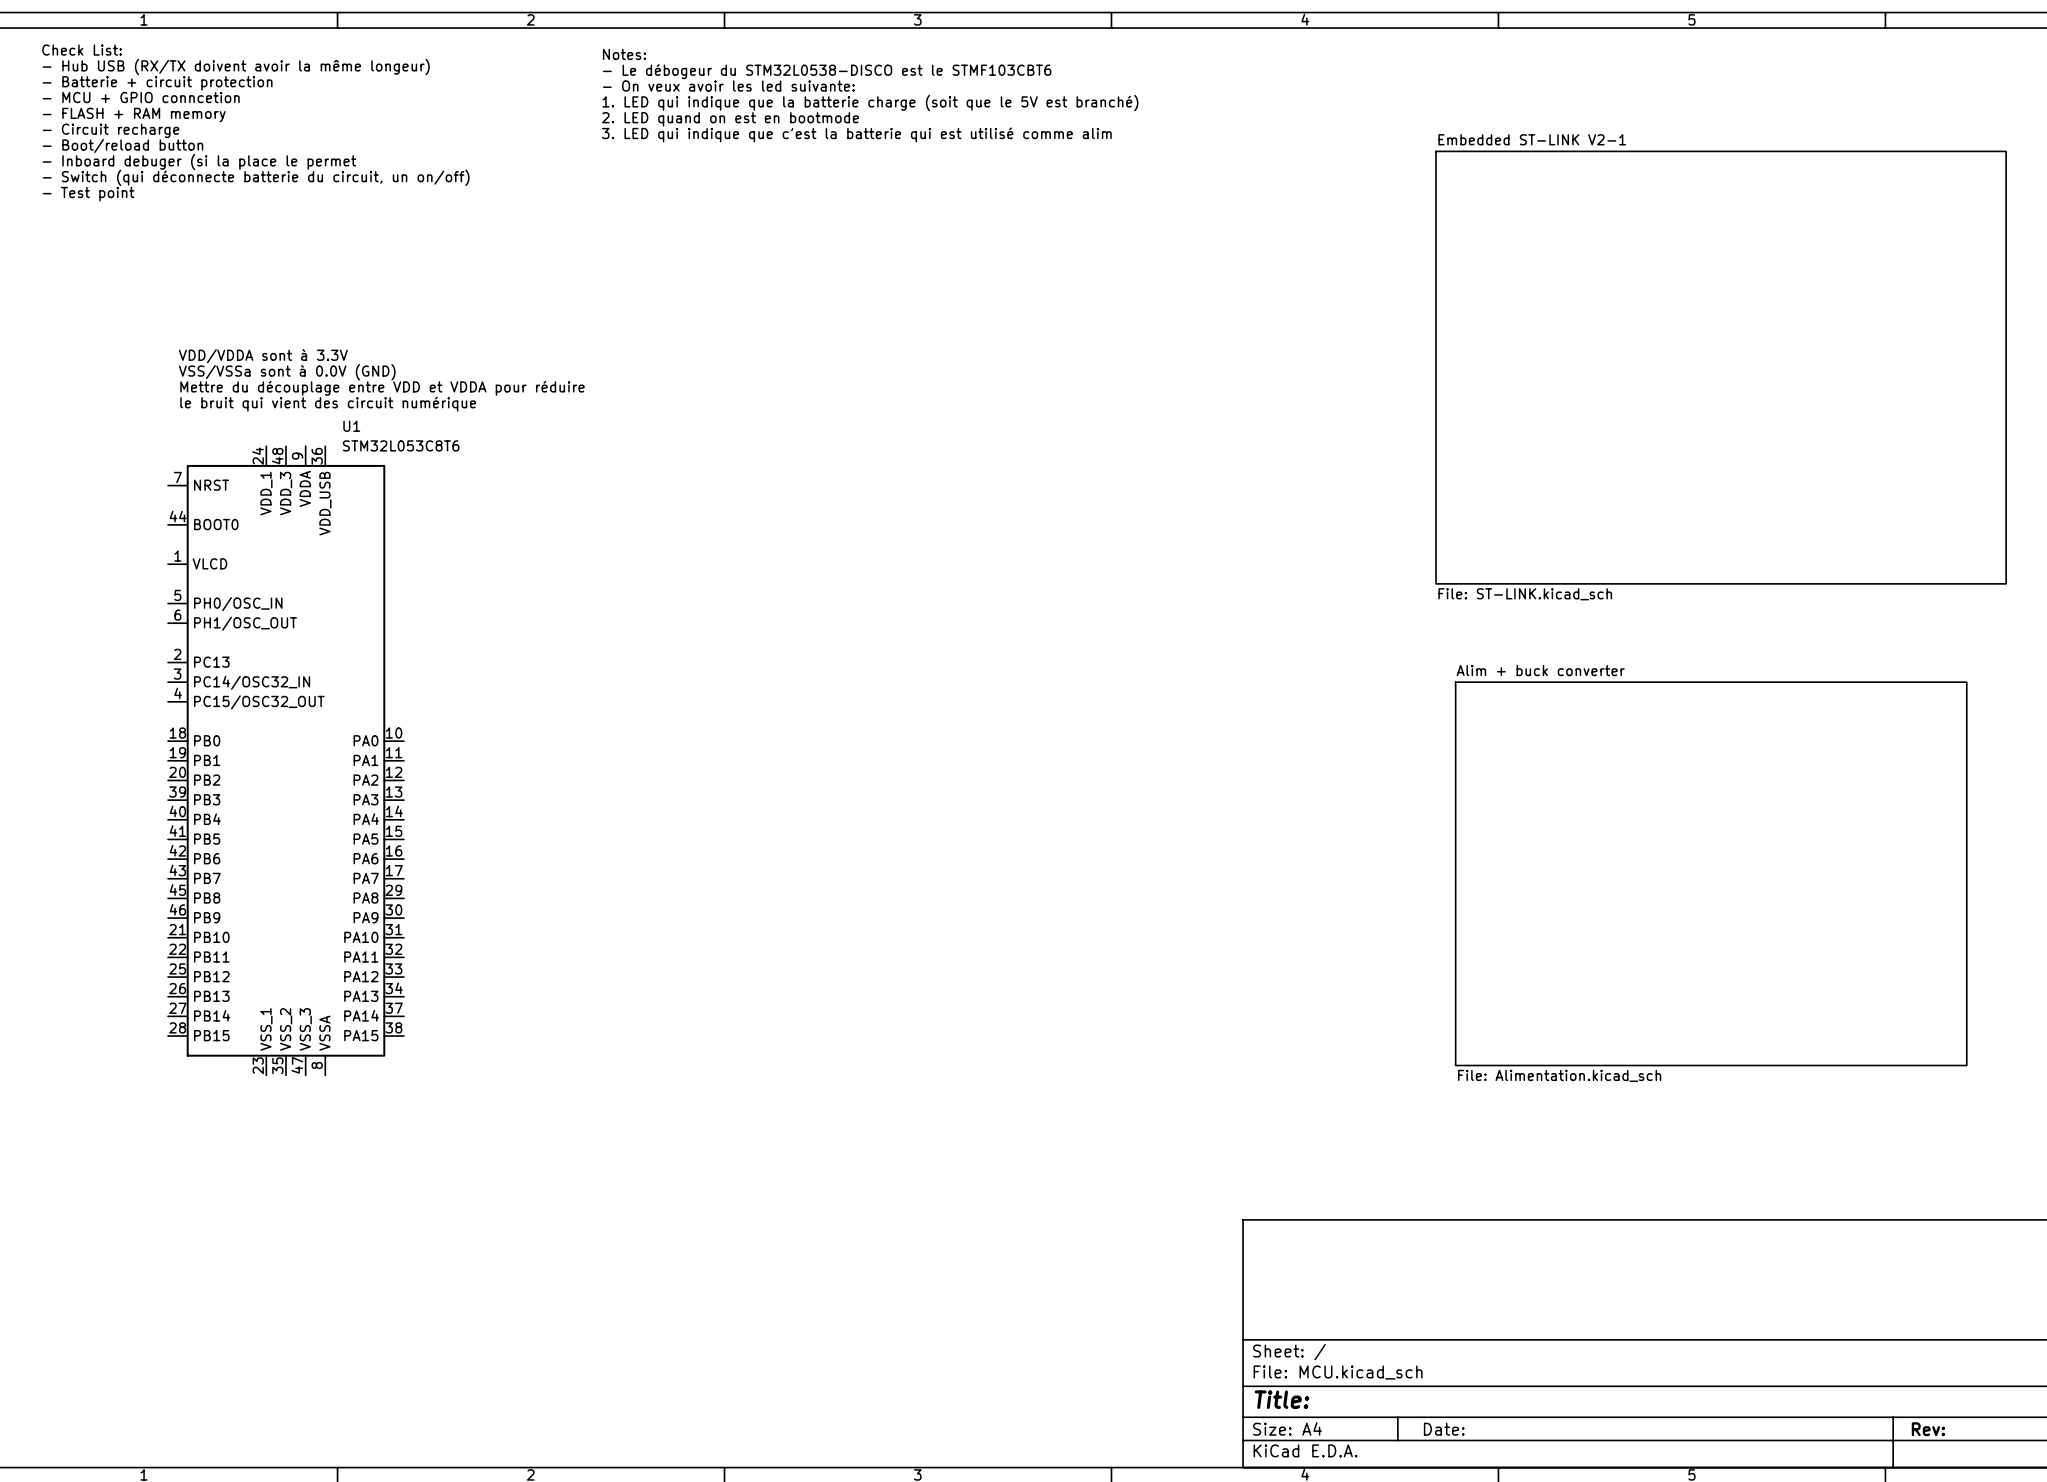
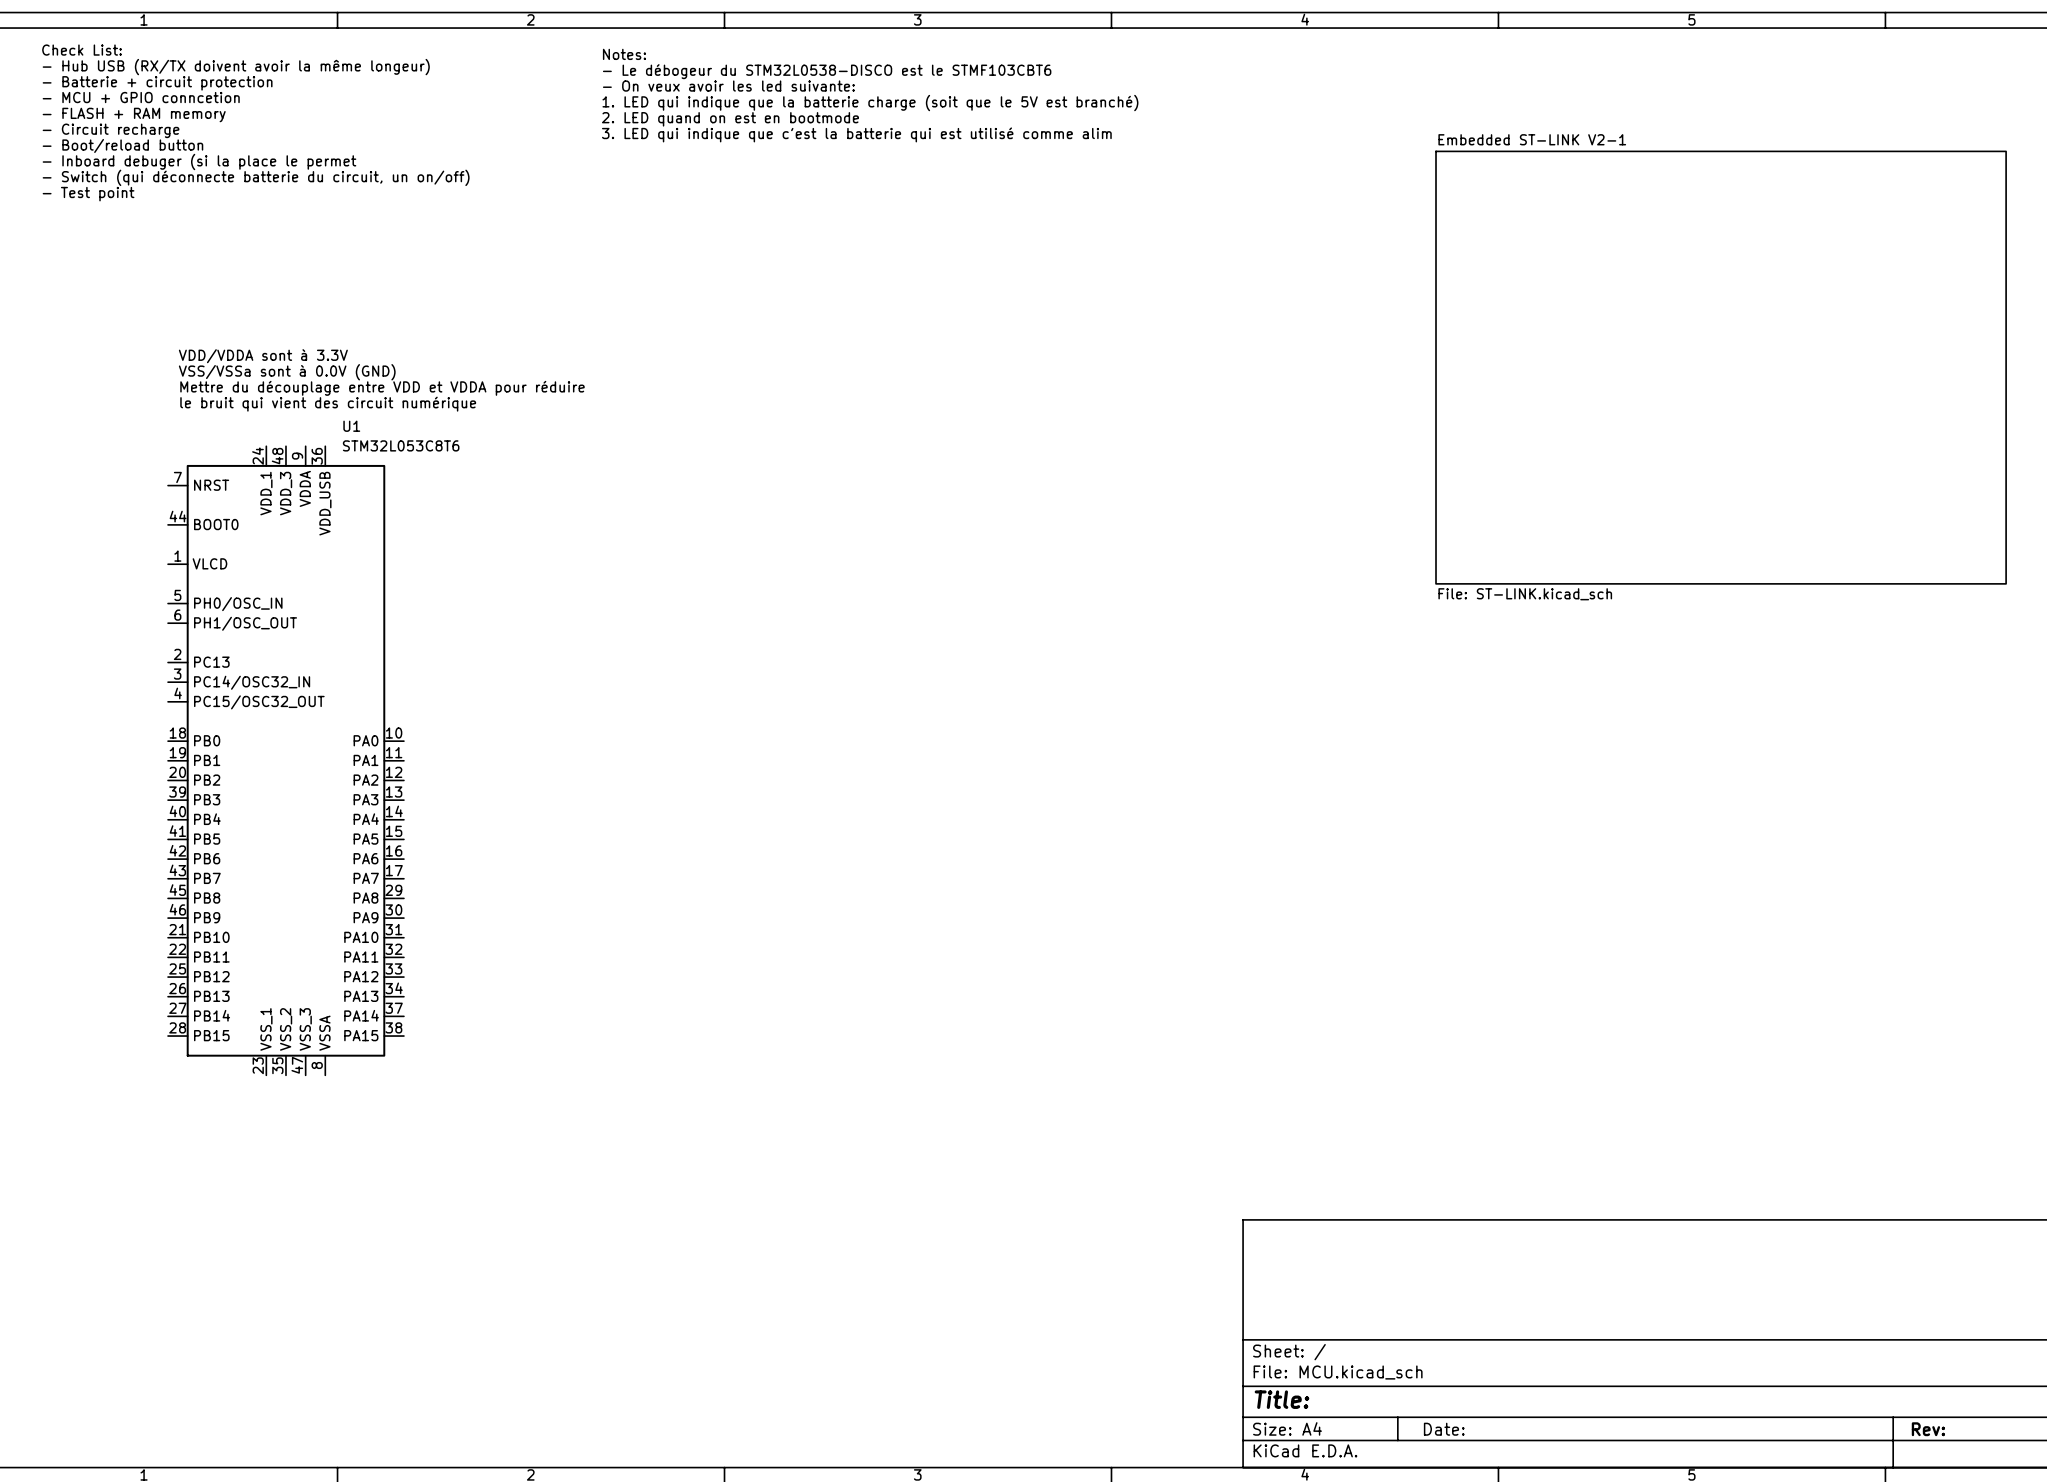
sheet Alim + buck converter: File: Alimentation.kicad_sch (1711, 873) -> none

